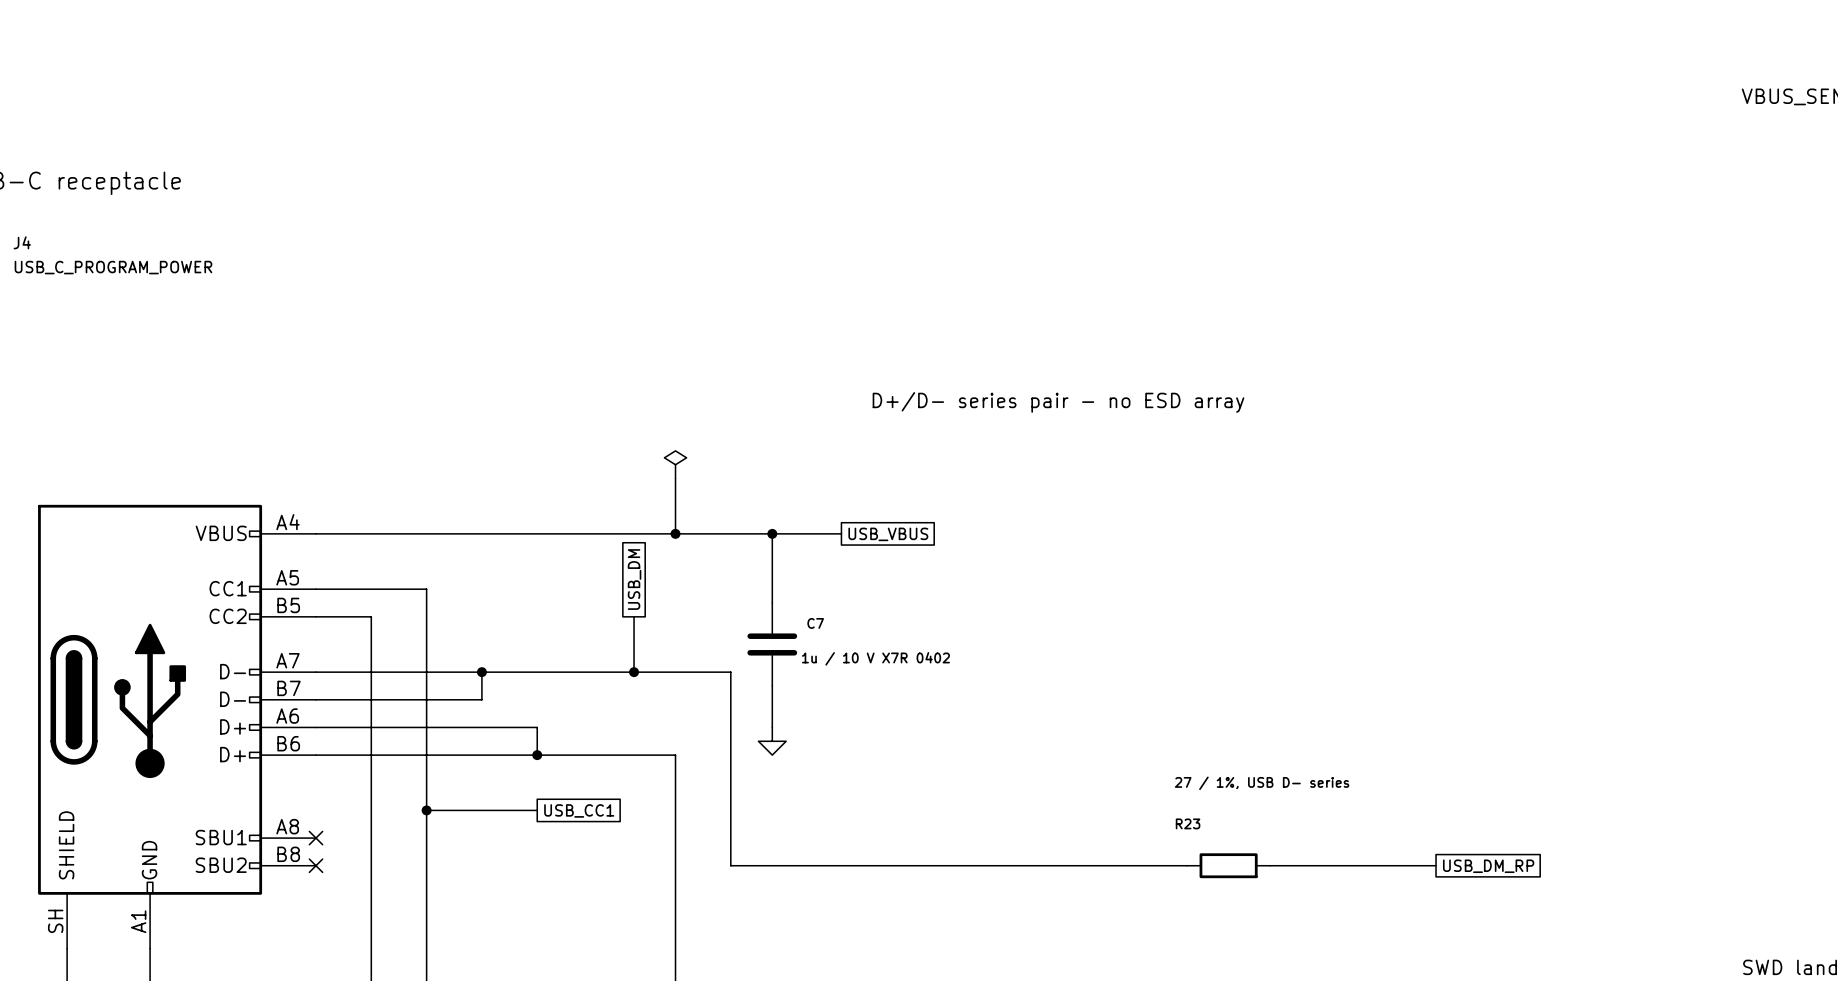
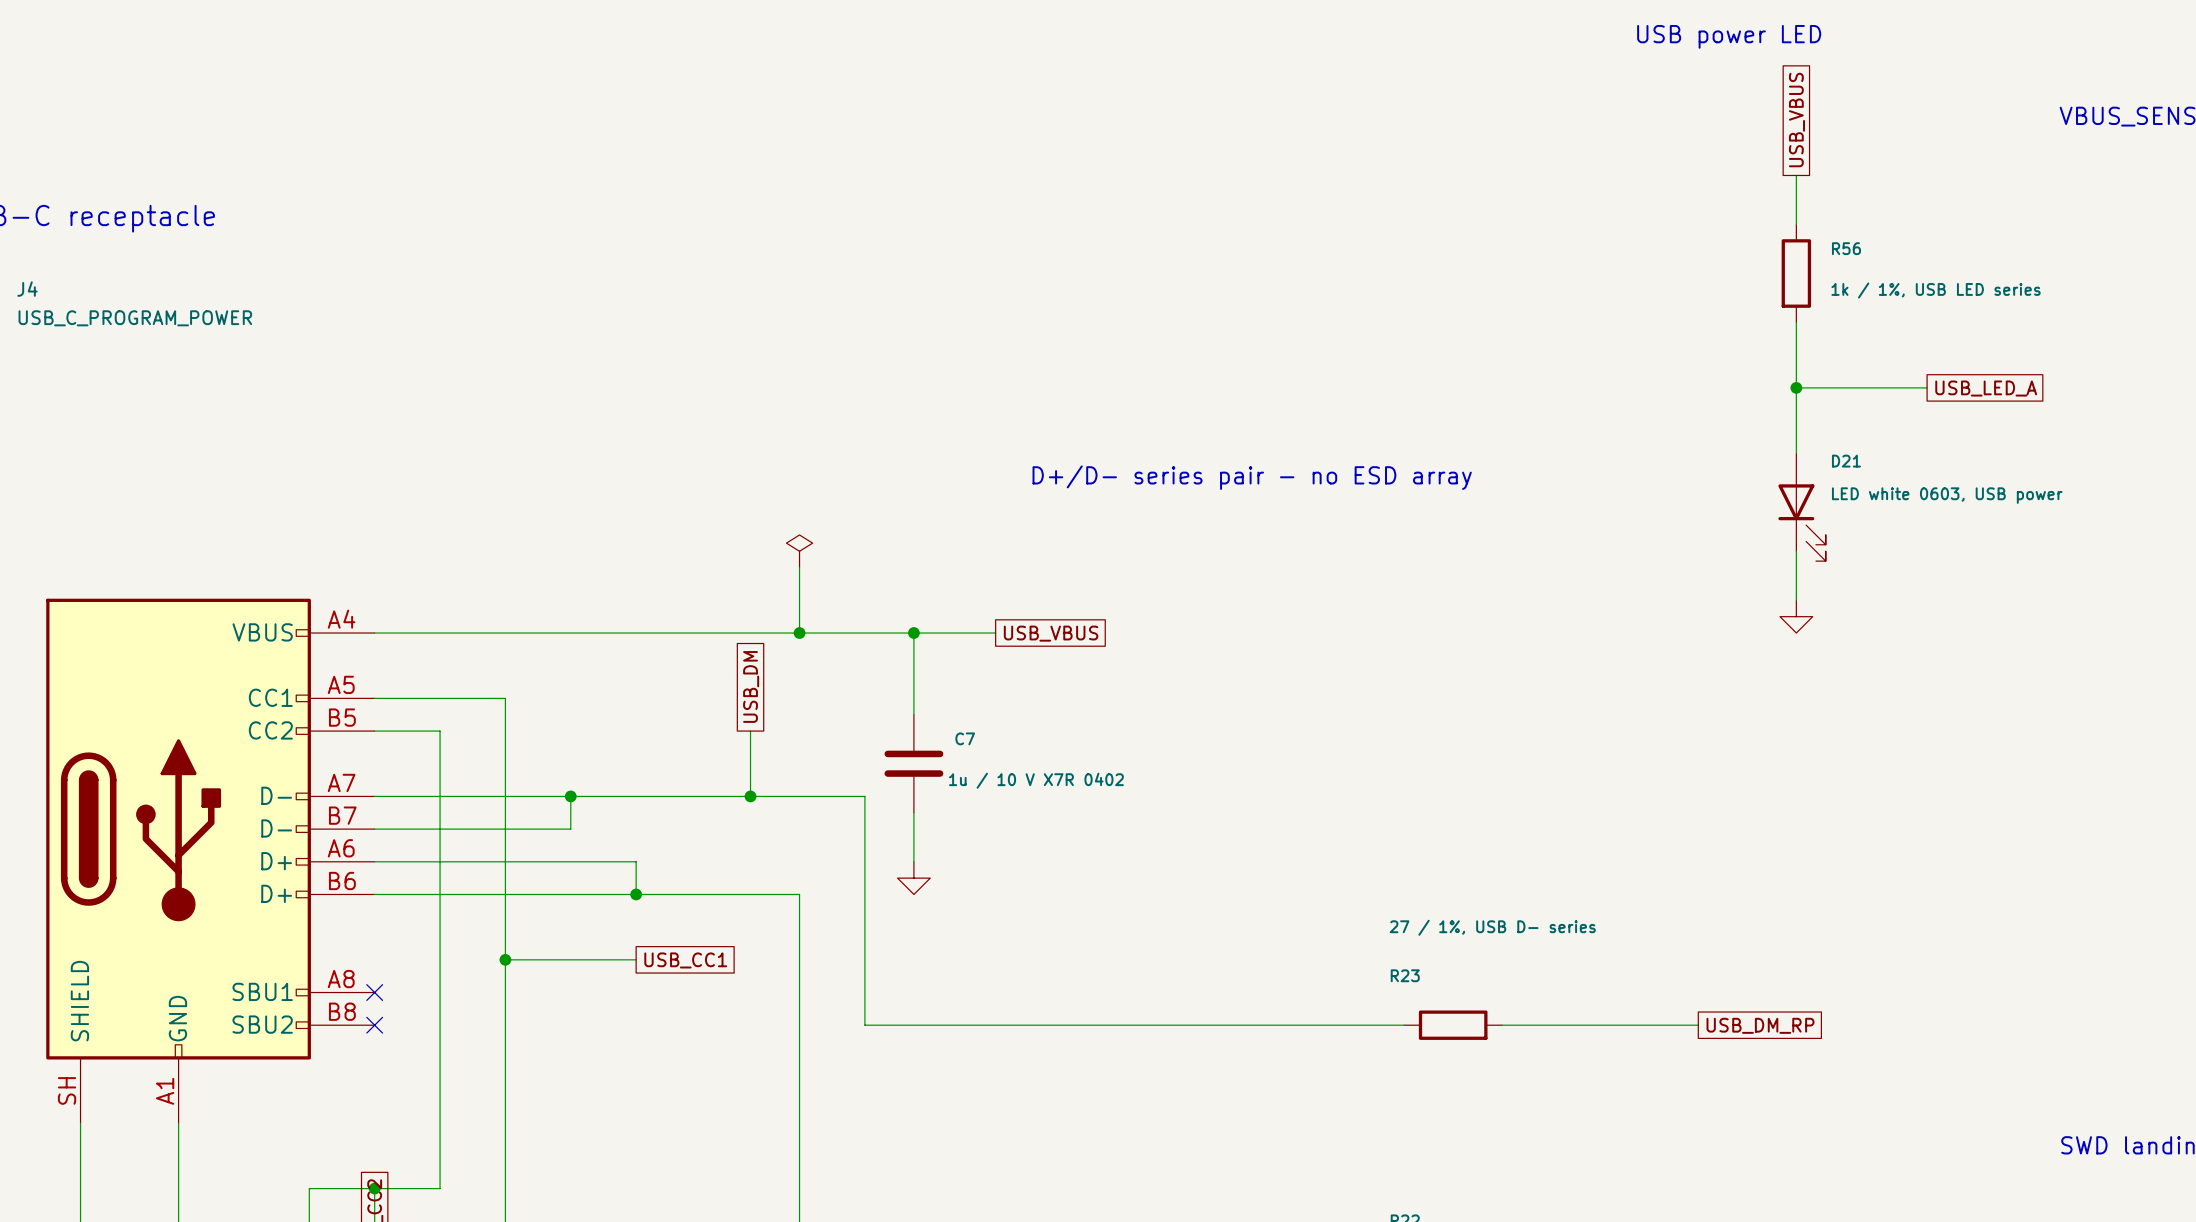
text: none -> USB power LED (1729, 36)
global label: none -> USB_VBUS (1796, 120)
wire: none -> (1796, 175) (1796, 224)
R56: none -> 1k / 1%, USB LED series (1796, 273)
wire: none -> (1796, 322) (1796, 453)
wire: none -> (1796, 387) (1927, 387)
junction: none -> (1796, 387)
global label: none -> USB_LED_A (1986, 388)
D21: none -> LED white 0603, USB power (1802, 507)
wire: none -> (1796, 551) (1796, 600)
power symbol: none -> (1796, 616)

